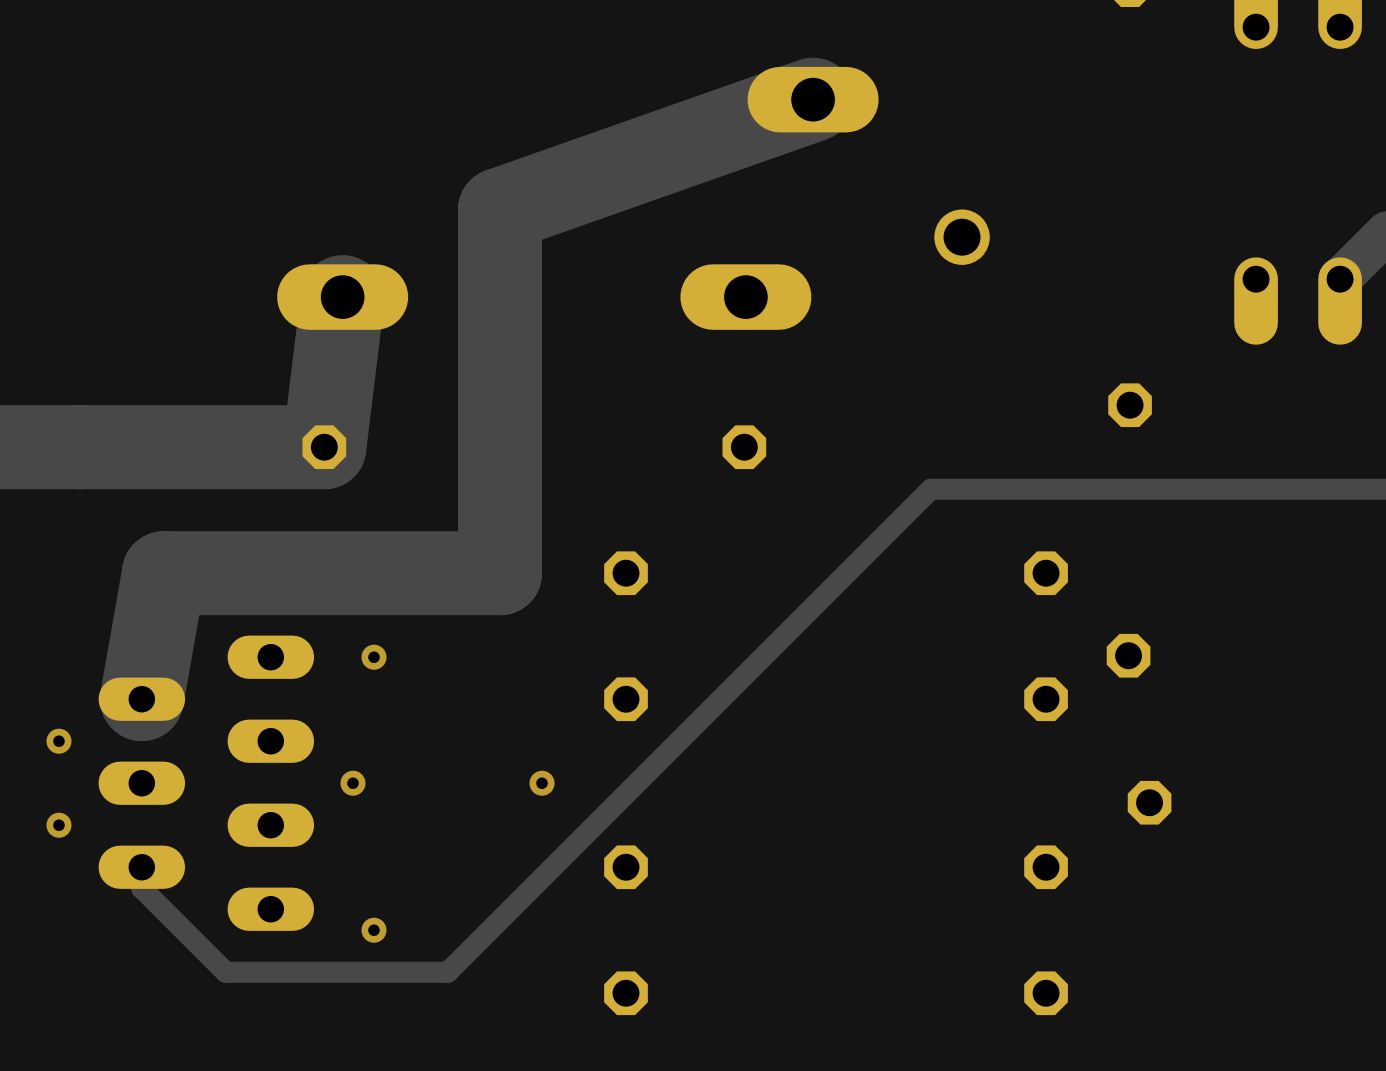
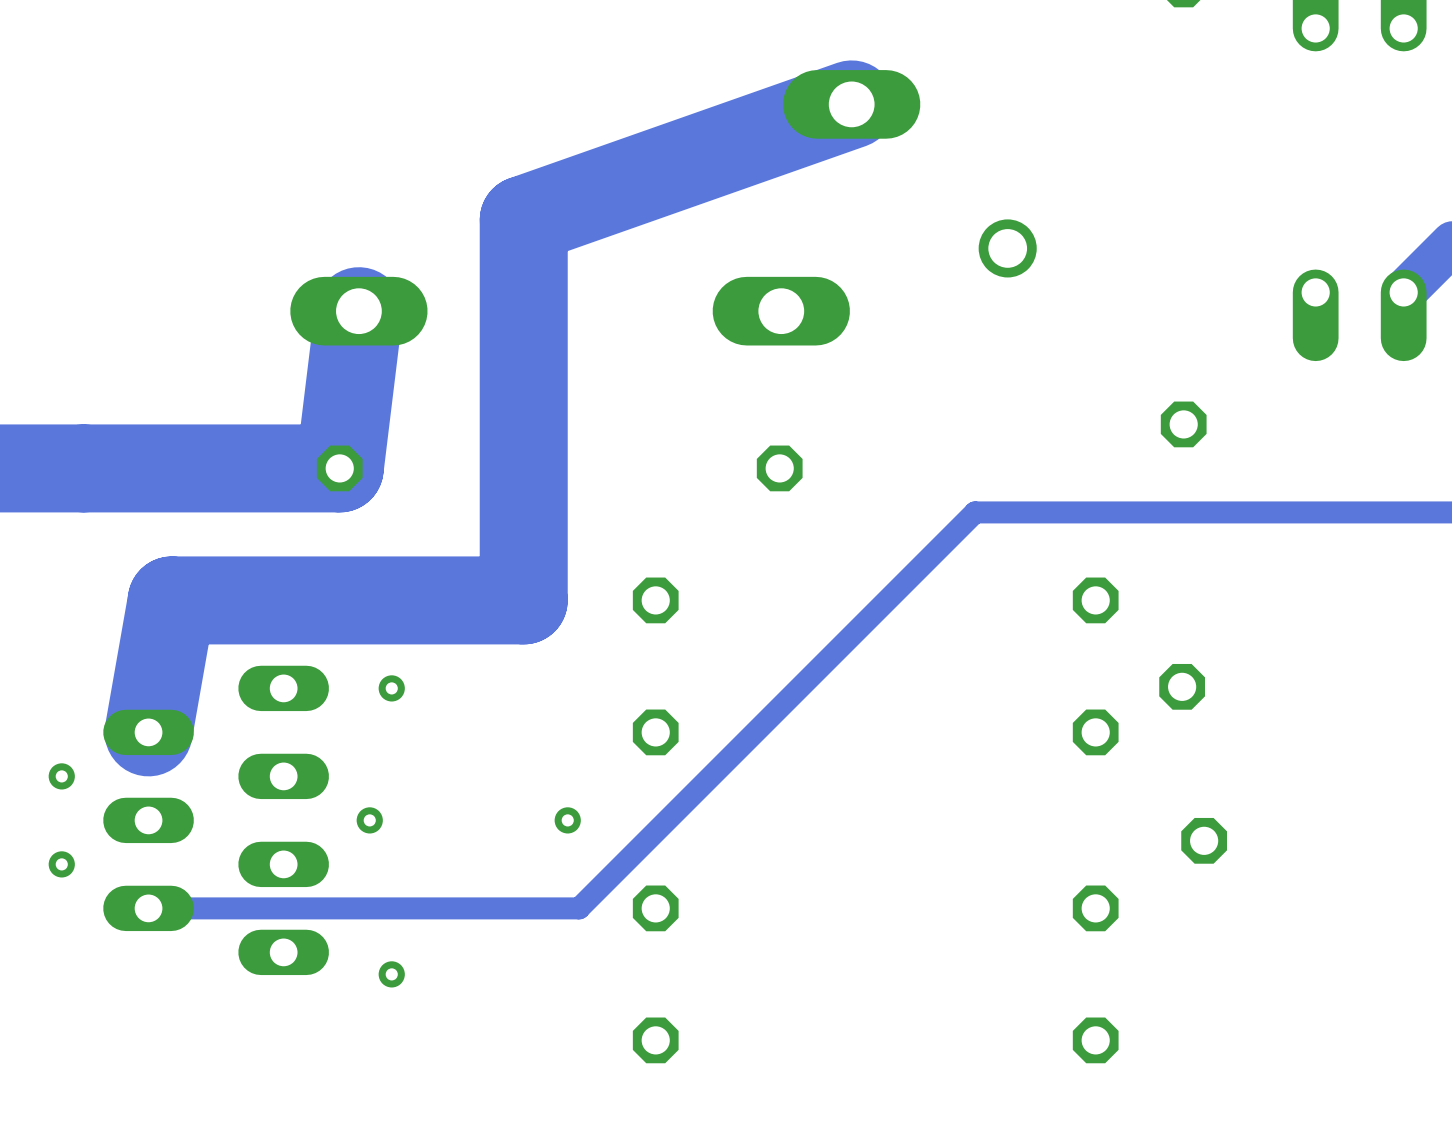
track: (552, 867) (447, 972) (225, 972) (141, 888) (141, 867) -> (579, 908) (148, 908)

